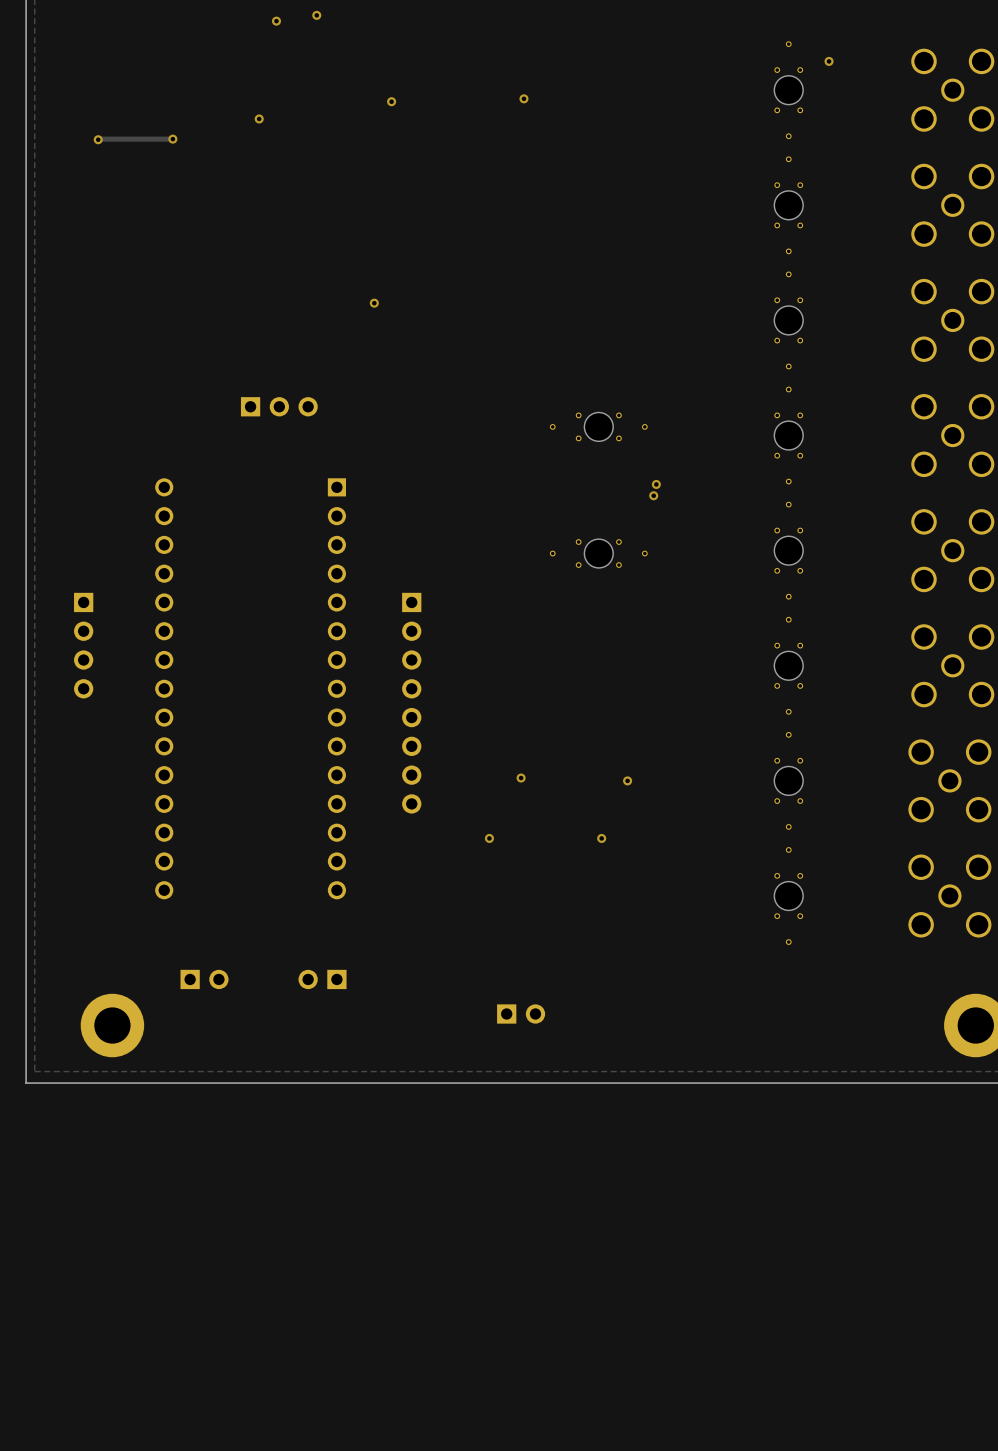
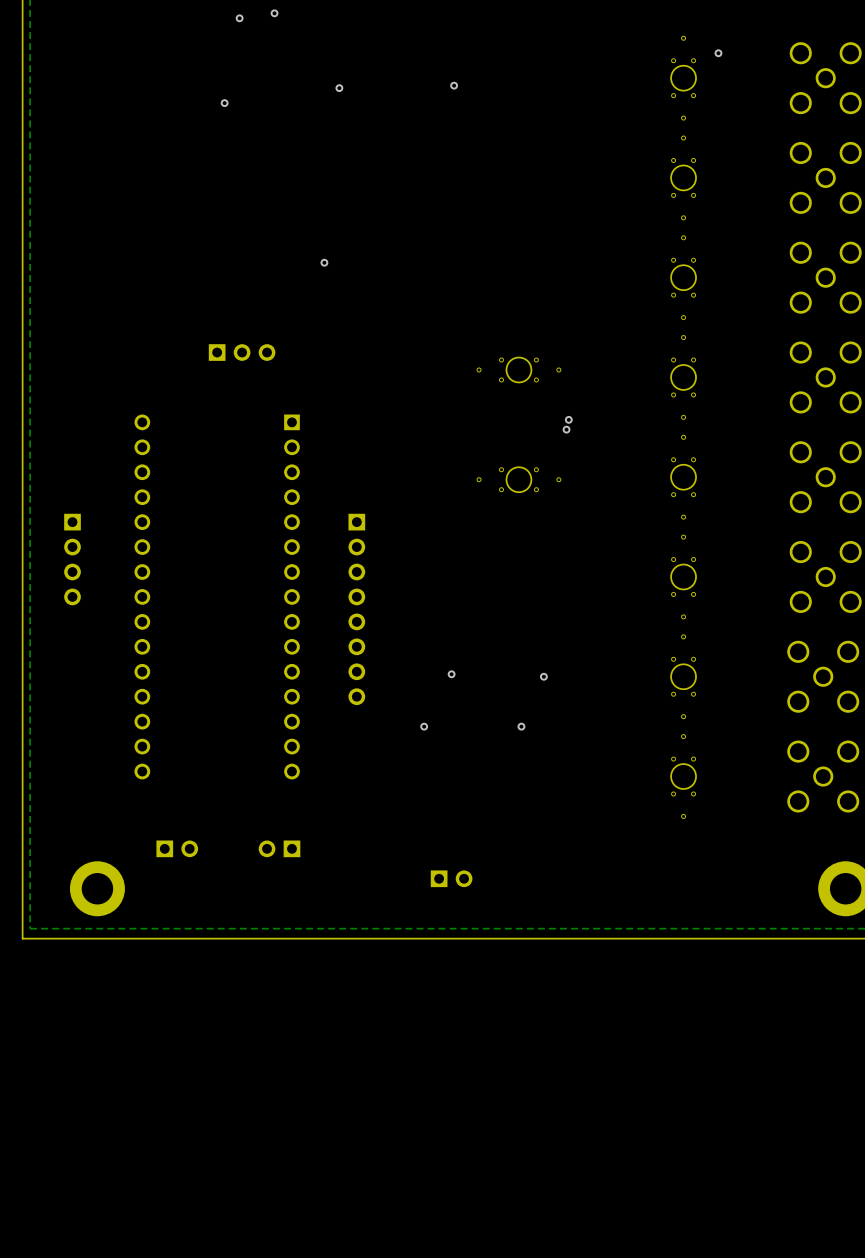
via: (98, 139) -> none
track: (172, 139) (98, 139) -> none
via: (172, 139) -> none

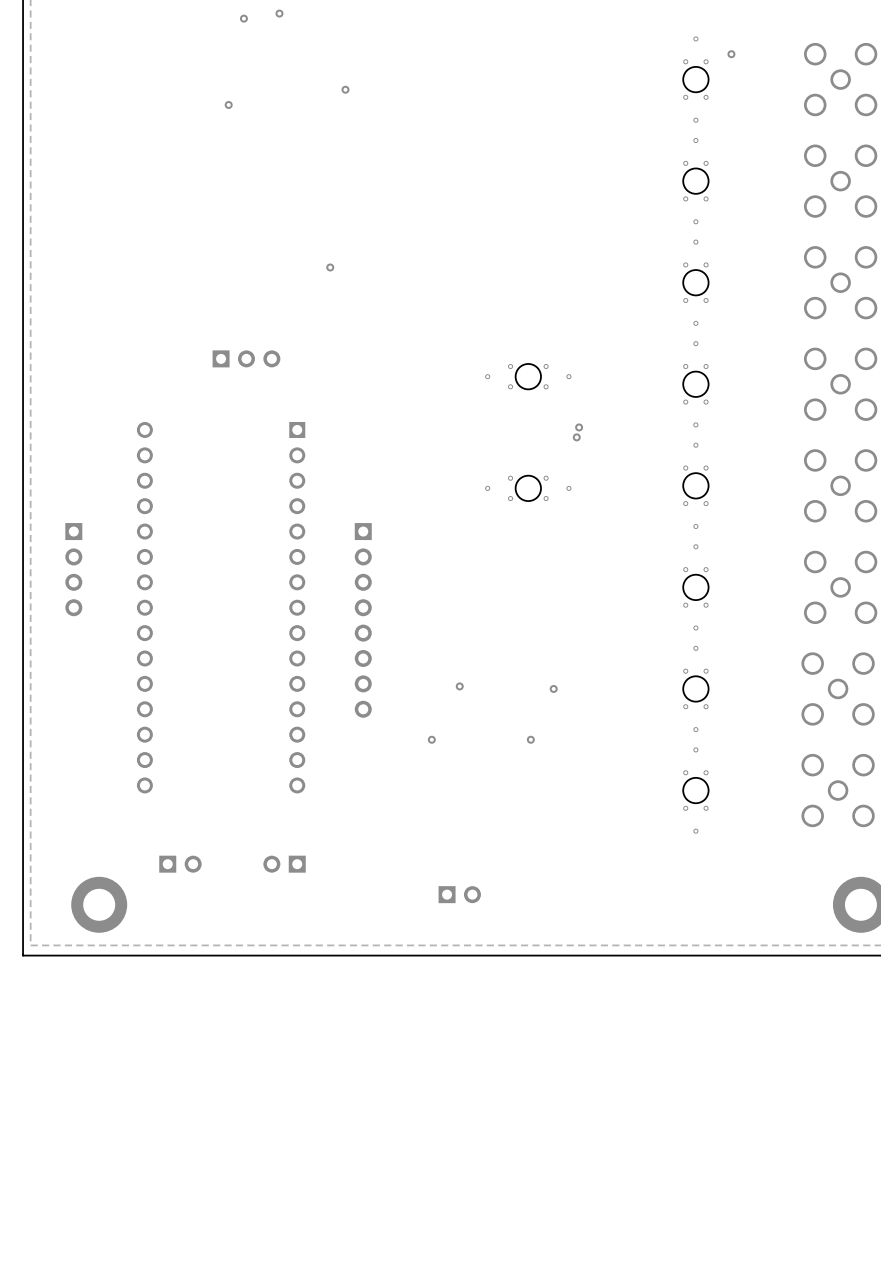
via: (454, 85) -> none

